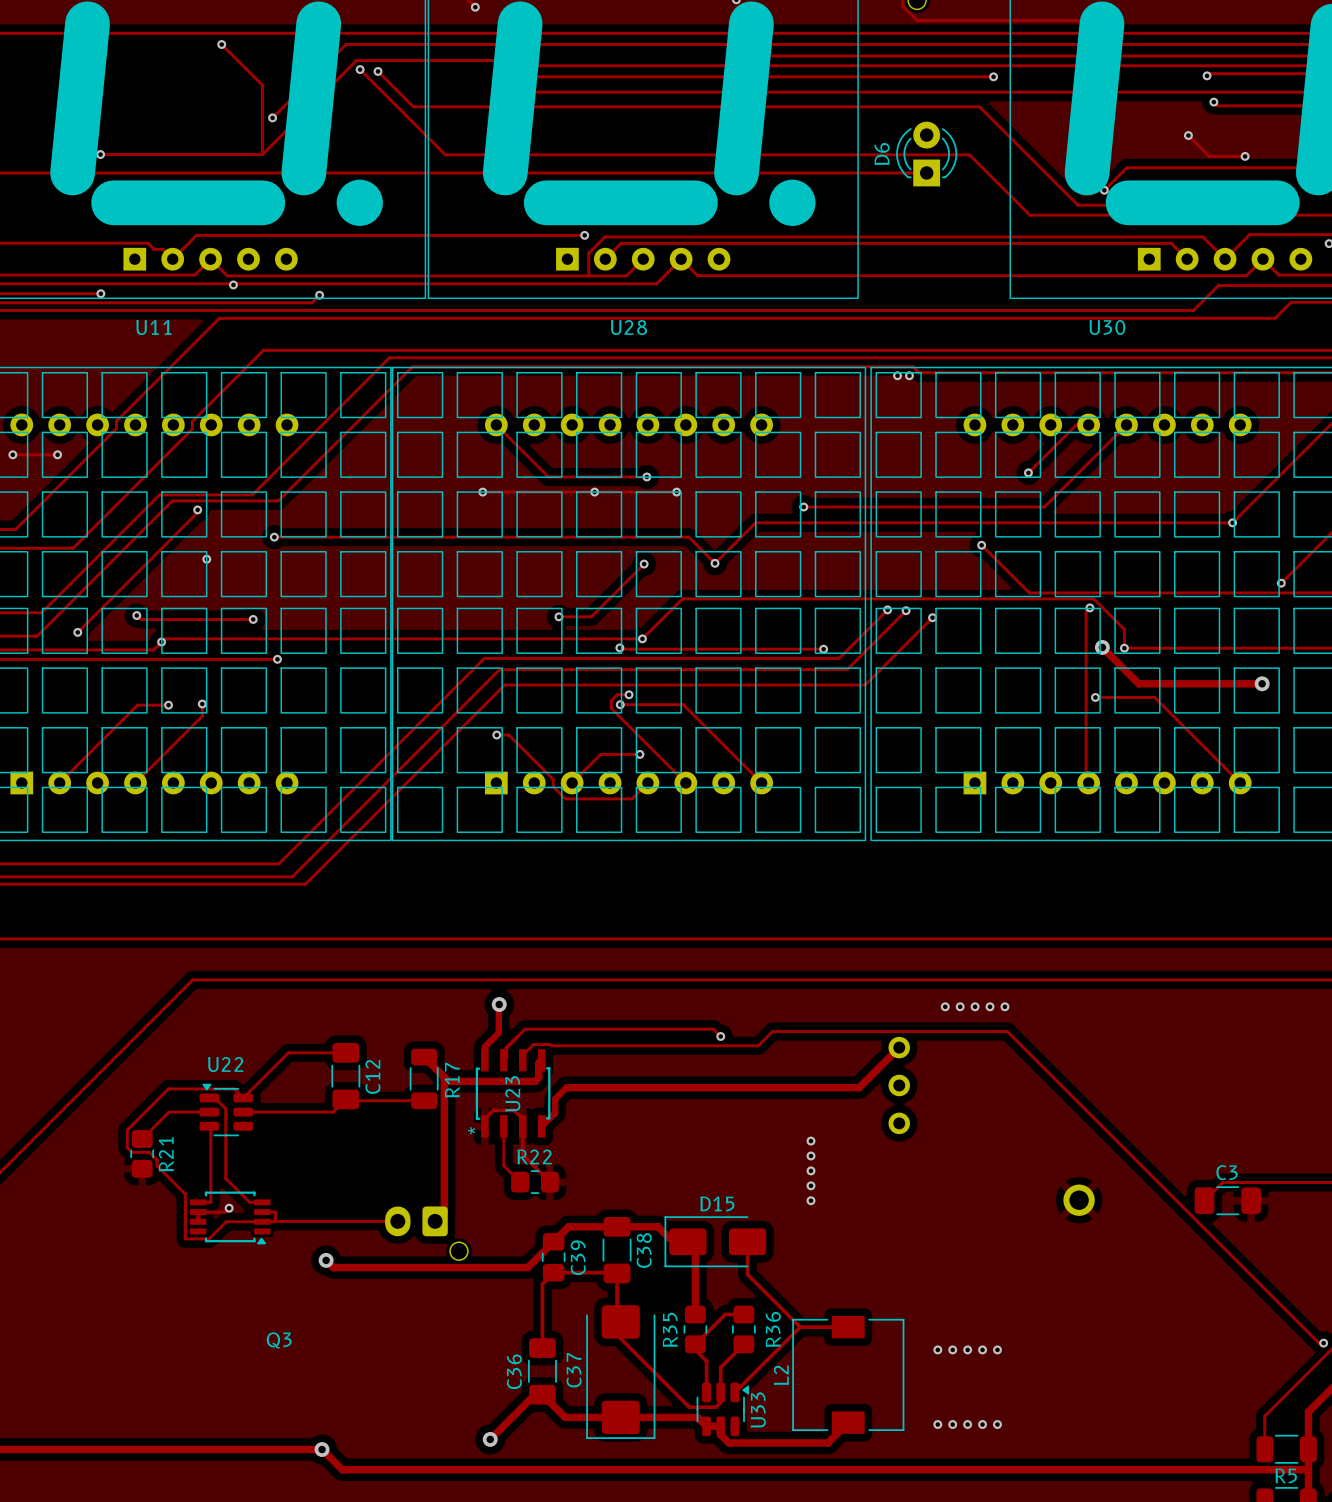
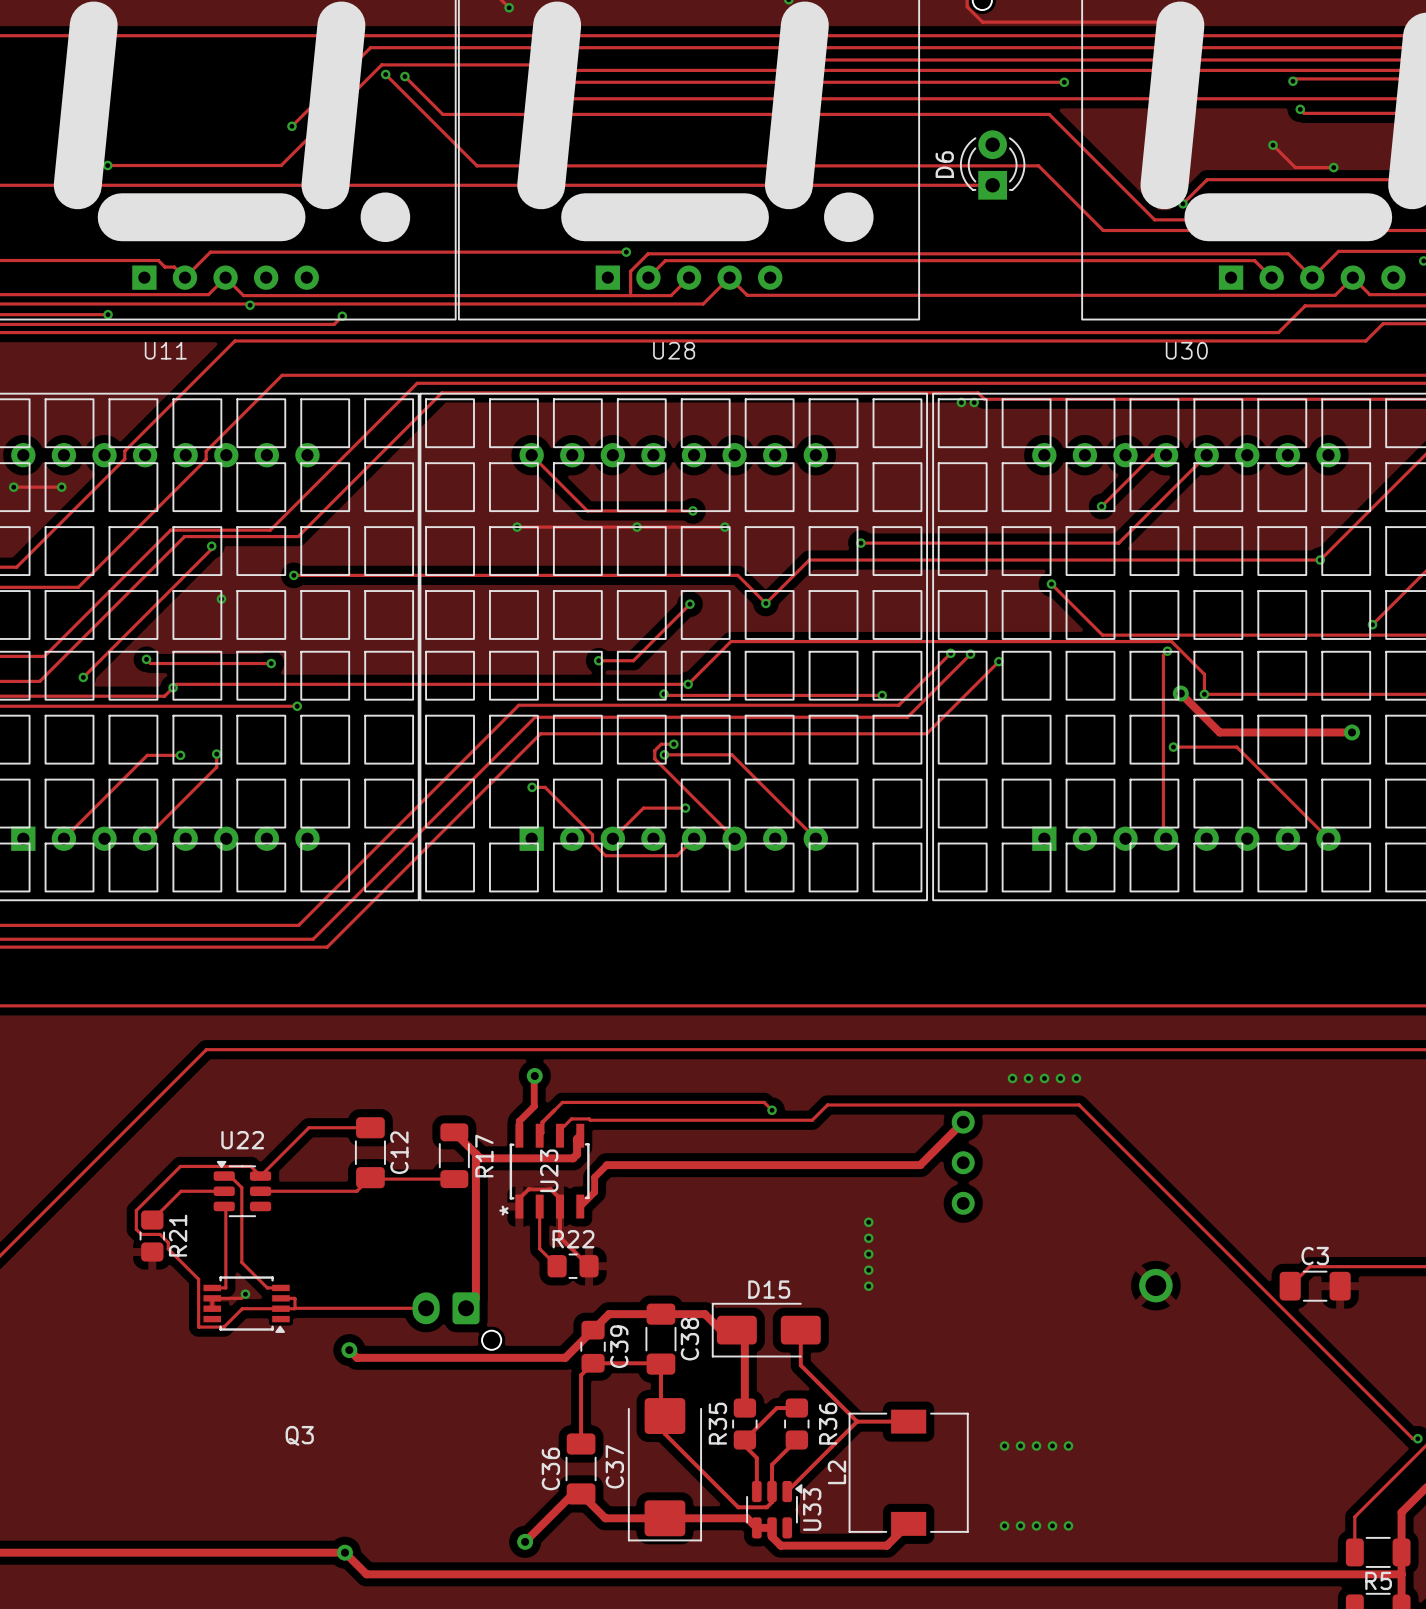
track: (221, 44) (262, 85) (262, 154) -> none
via: (221, 44) -> none

